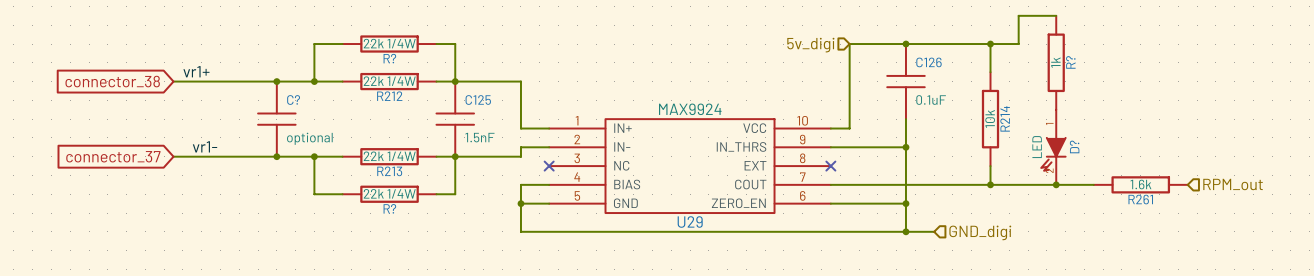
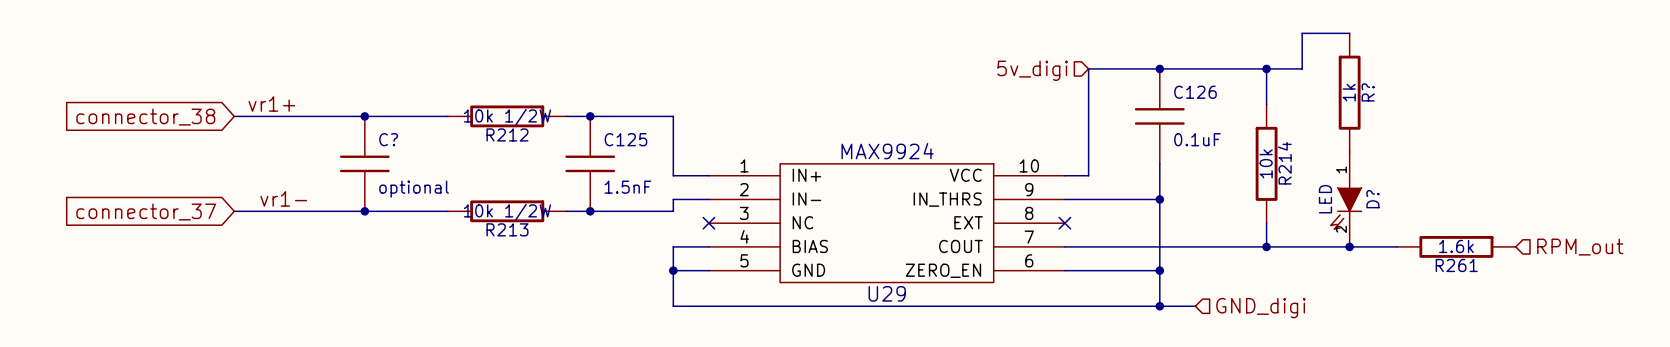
wire: (342, 44) (314, 44) (314, 81) -> none
R?: 22k 1/4W (389, 44) -> none
wire: (436, 44) (455, 44) (455, 81) -> none
junction: (314, 81) -> none
R212 value: 22k 1/4W (389, 81) -> 10k 1/2W (507, 117)
wire: (314, 156) (314, 194) (342, 194) -> none
junction: (314, 156) -> none
R213 value: 22k 1/4W (389, 156) -> 10k 1/2W (507, 212)
wire: (455, 156) (455, 194) (436, 194) -> none
R?: 22k 1/4W (389, 194) -> none

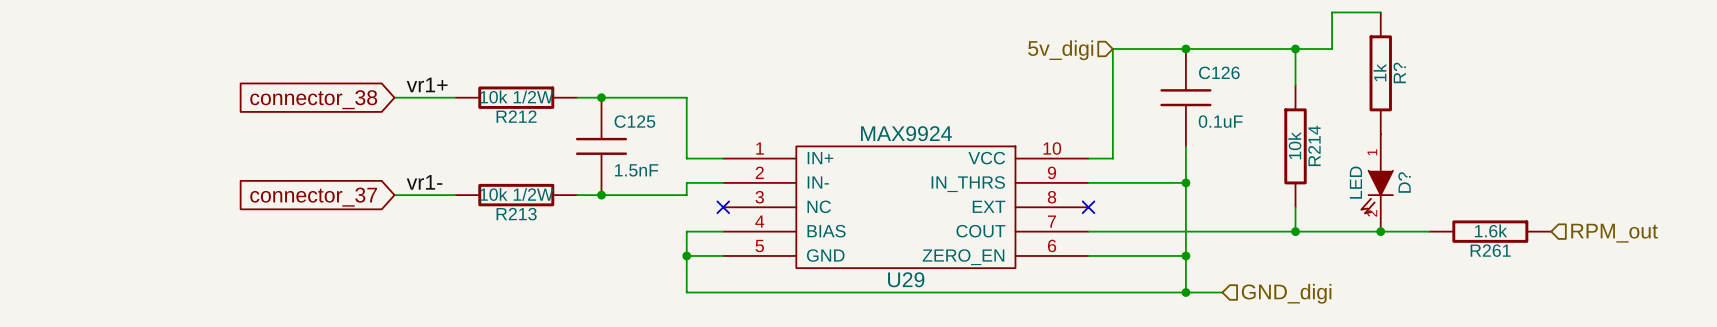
label position: vr1+ (271, 103) -> vr1+ (427, 84)
wire: (234, 116) (388, 116) -> none
junction: (364, 116) -> none
global label position: connector_38 (145, 117) -> connector_38 (313, 99)
C?: optional (364, 163) -> none
label position: vr1- (283, 198) -> vr1- (424, 182)
wire: (234, 211) (388, 211) -> none
junction: (364, 211) -> none
global label position: connector_37 (146, 212) -> connector_37 (313, 197)

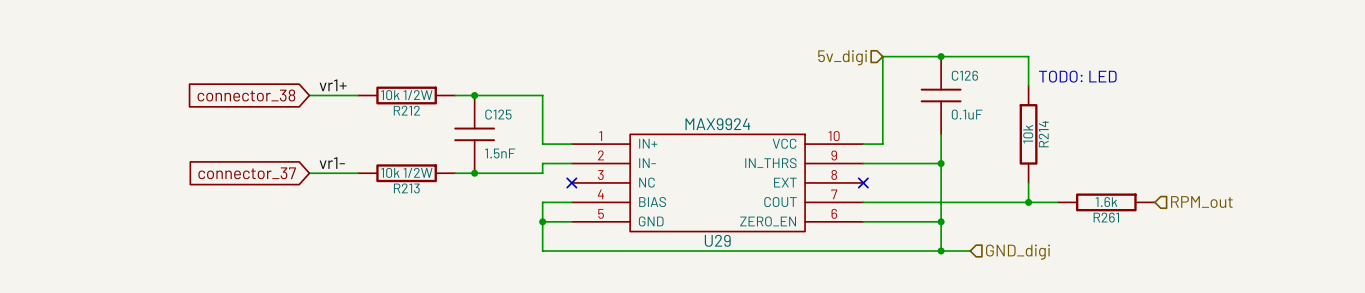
wire: (1380, 12) (1332, 12) (1332, 48) (1295, 48) -> none
junction: (1295, 48) -> none
R?: 1k (1380, 73) -> none
text: none -> TODO: LED (1077, 76)
D?: LED (1377, 182) -> none
wire: (1332, 231) (1429, 231) -> none
junction: (1380, 231) -> none
R261 position: (1490, 231) -> (1106, 202)
hierarchical label position: RPM_out (1614, 233) -> RPM_out (1201, 202)

